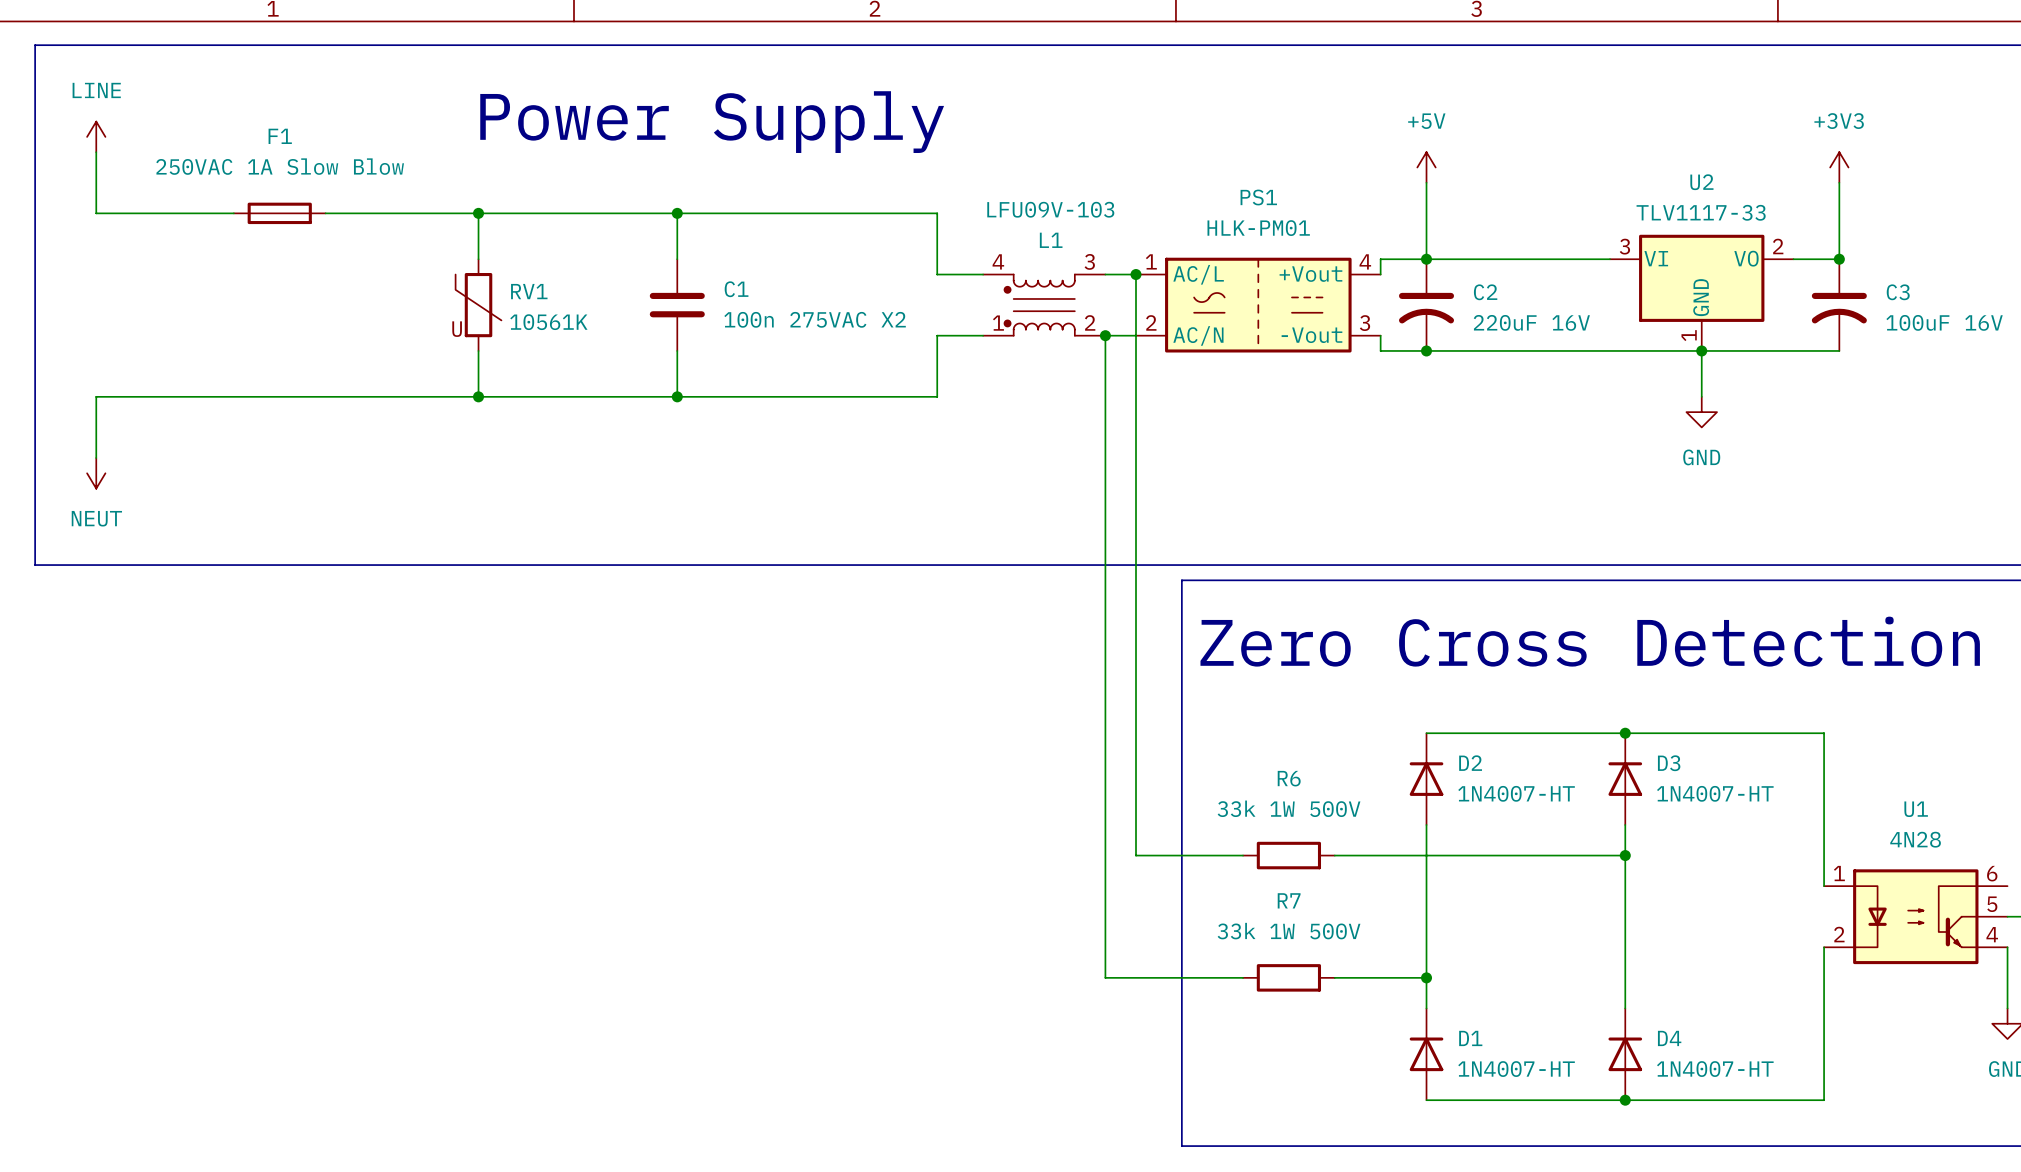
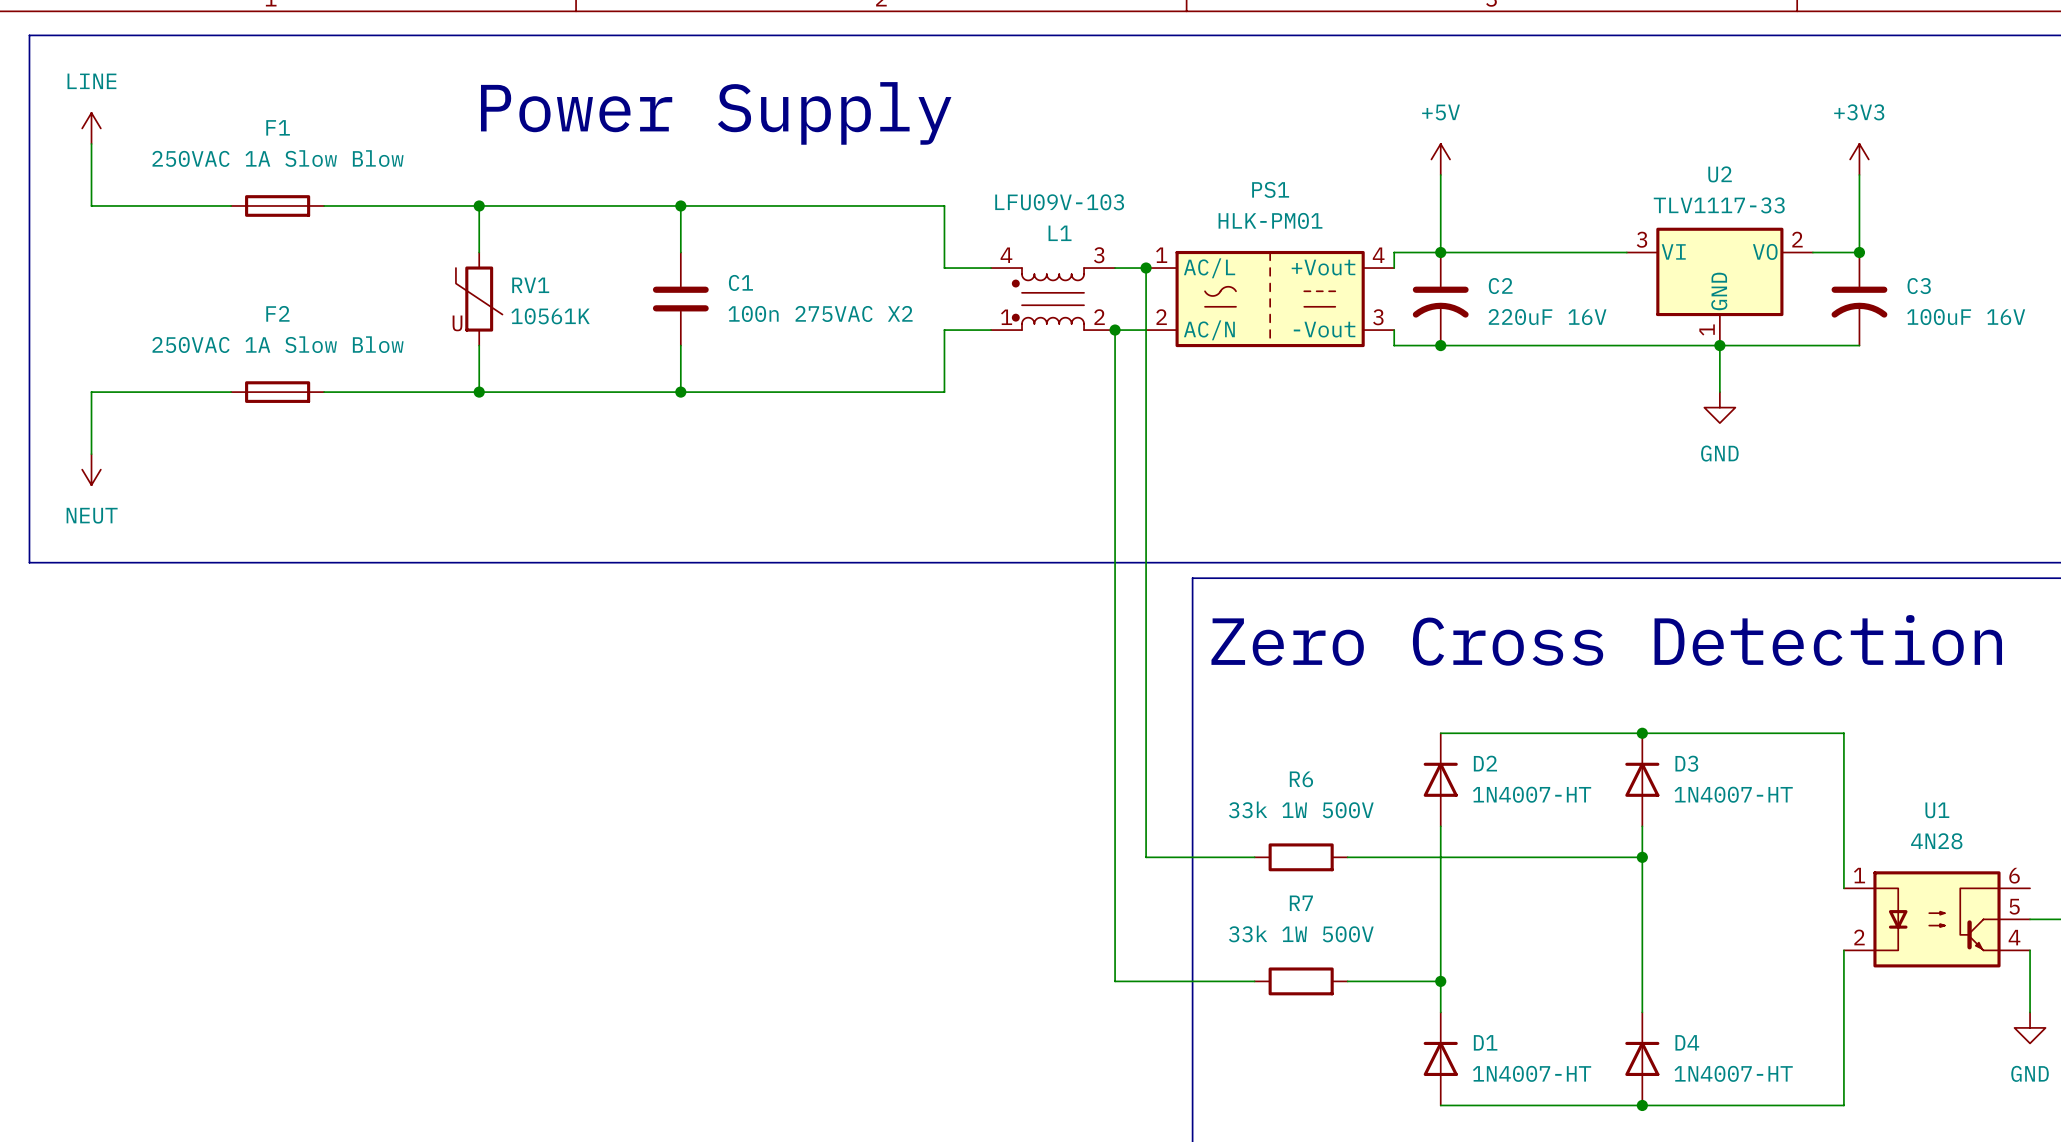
F2: none -> 250VAC 1A Slow Blow (277, 392)

